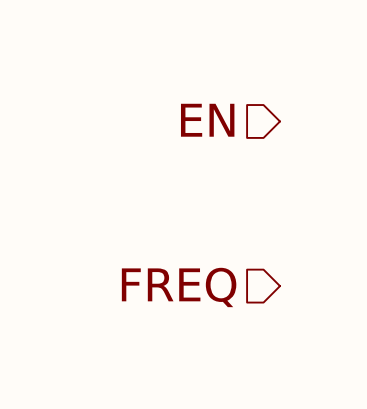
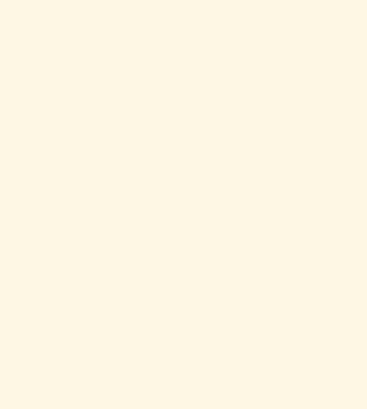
hierarchical label: EN (207, 120) -> none
hierarchical label: FREQ (179, 287) -> none

